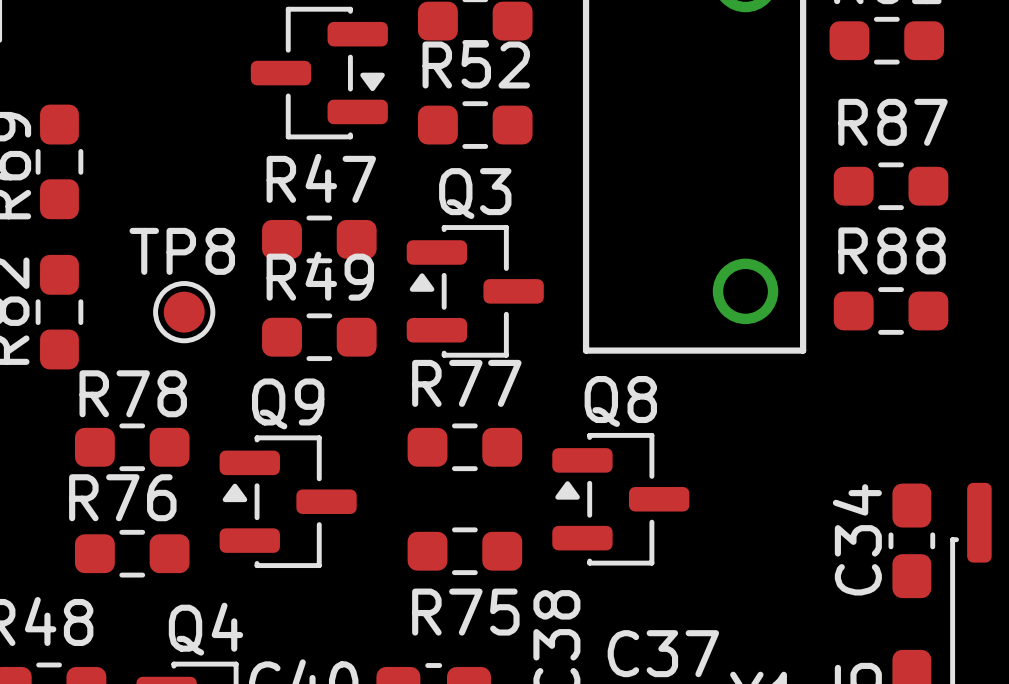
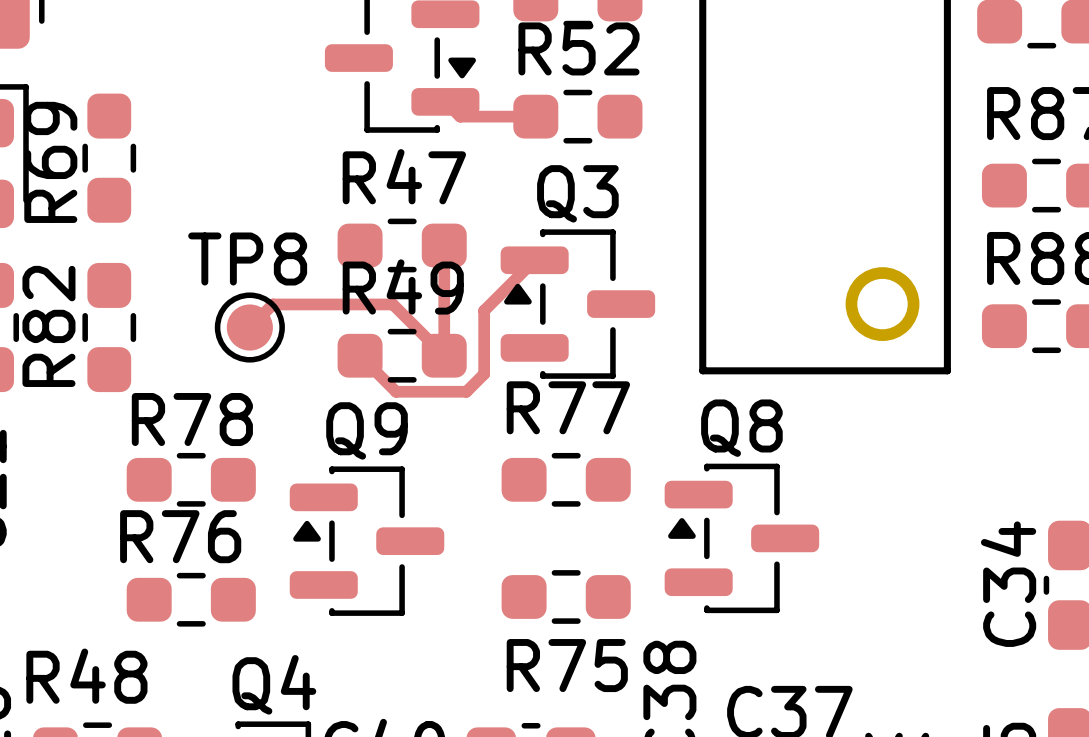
top track: none -> (445, 101) (460, 116) (535, 116)
top track: none -> (444, 245) (444, 355) (392, 304) (272, 304) (249, 327)
top track: none -> (534, 260) (484, 310) (484, 374) (466, 391) (396, 391) (360, 355)

